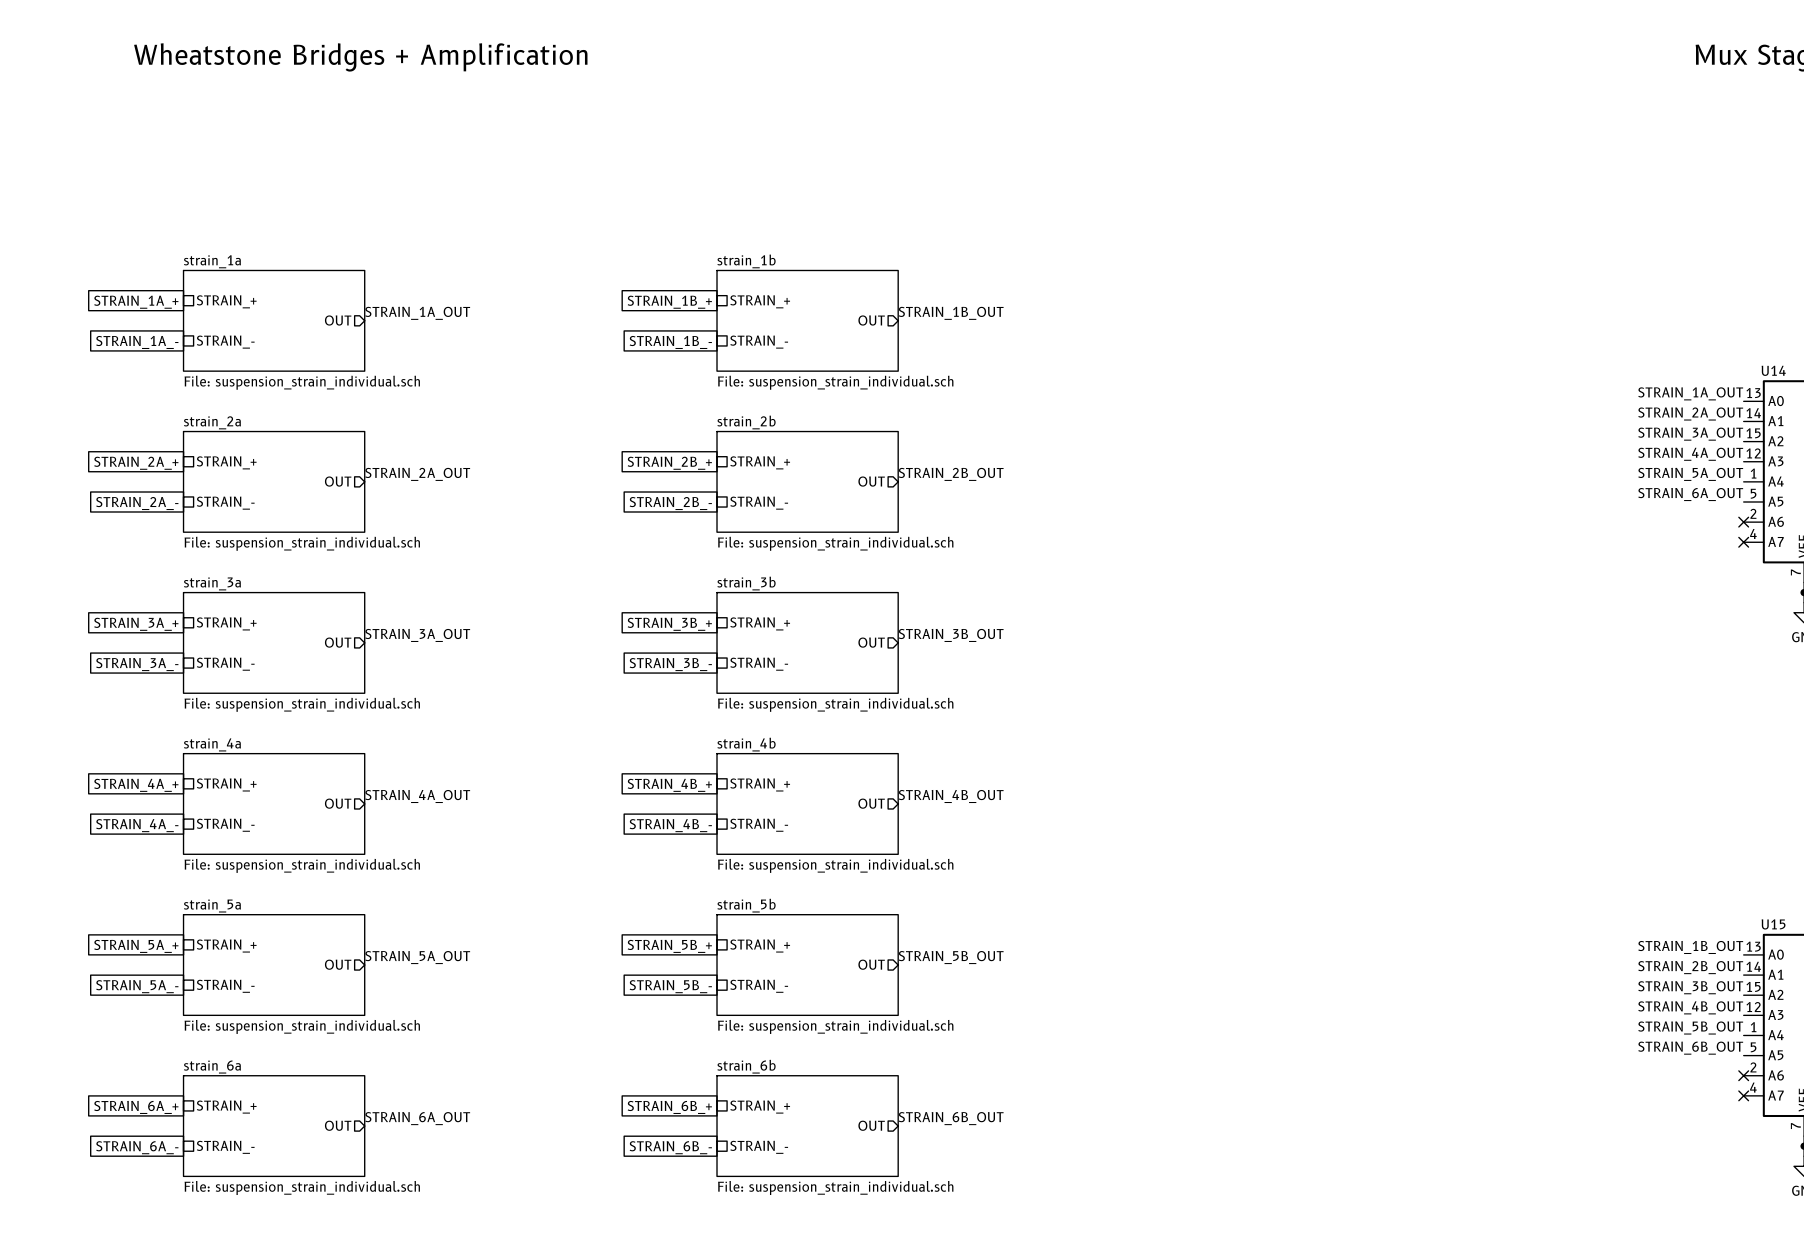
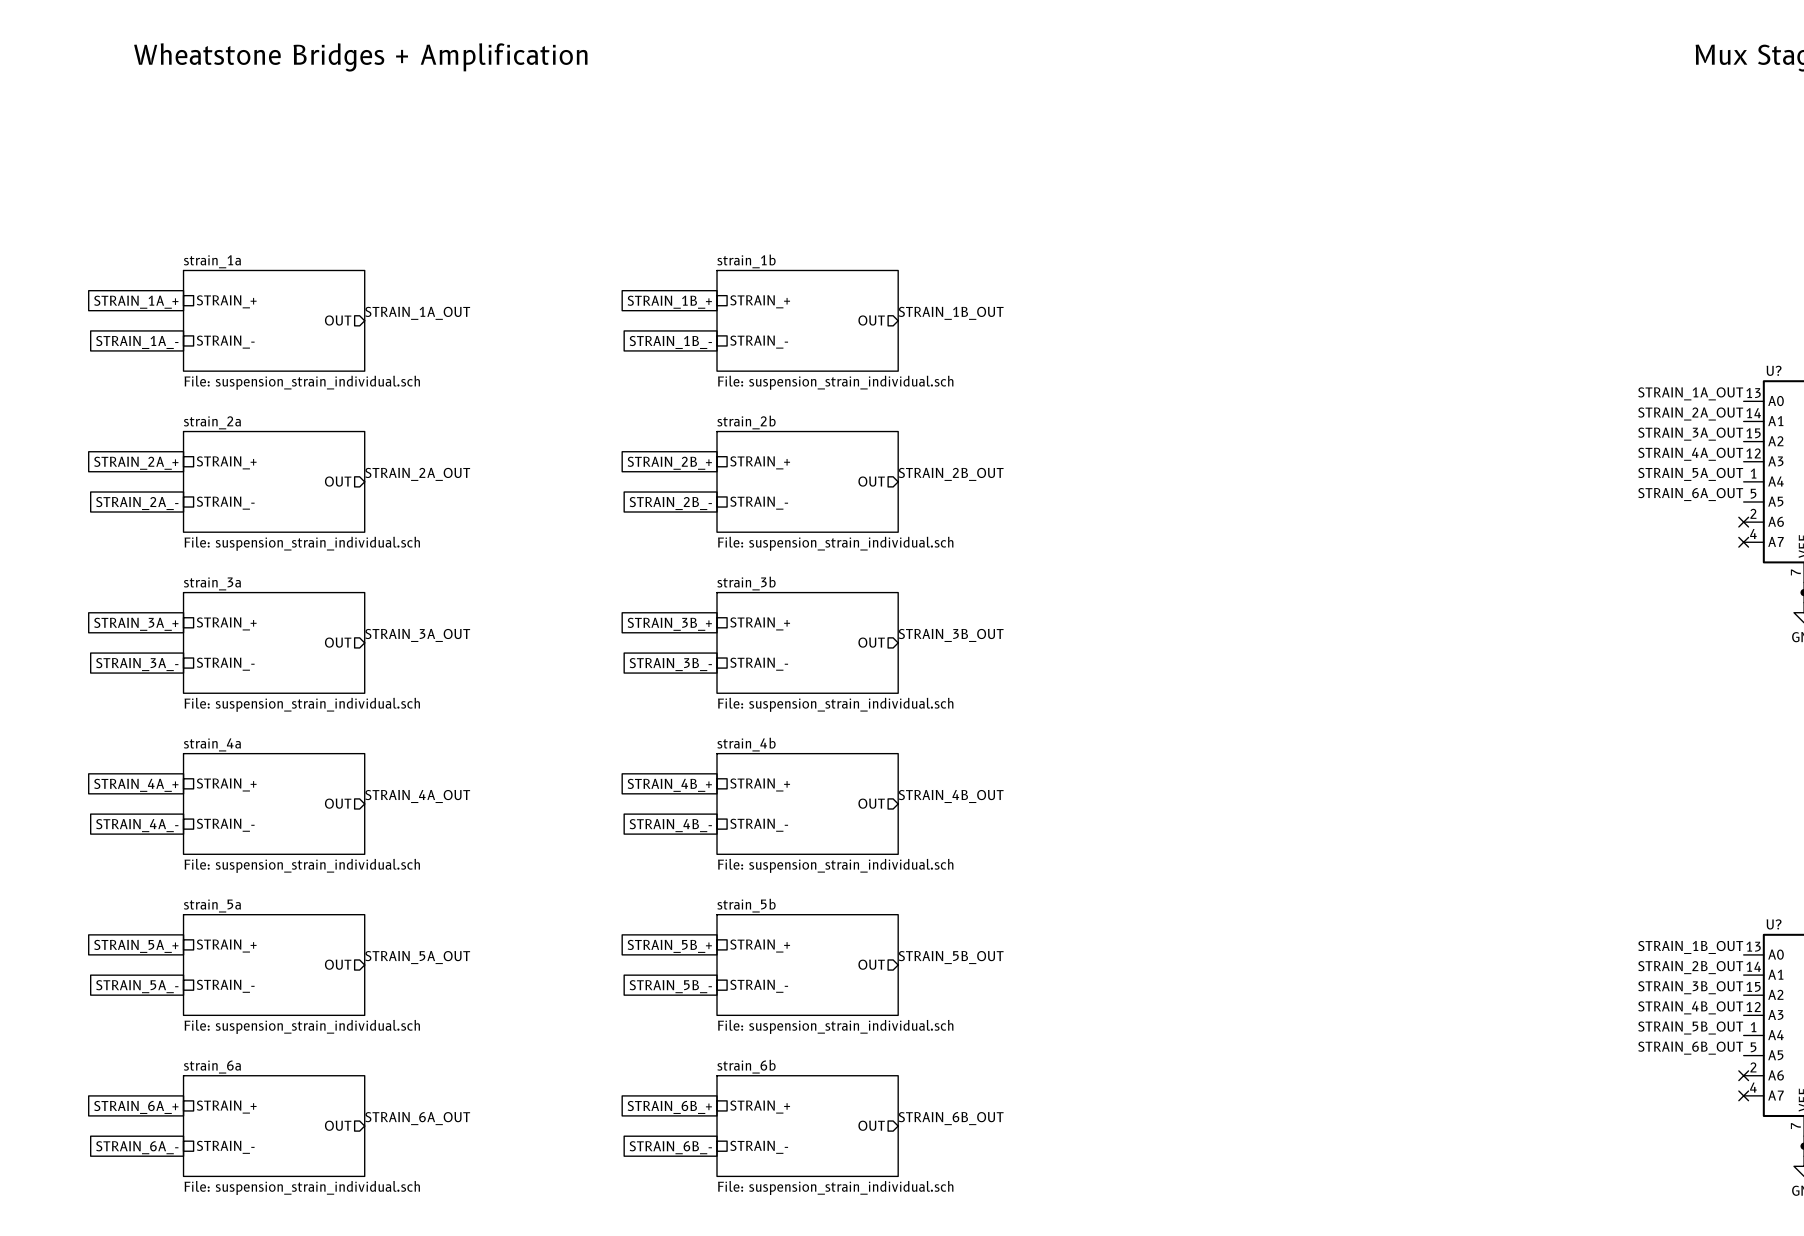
U14 name: U14 (1773, 370) -> U? (1774, 370)
U15 name: U15 (1773, 924) -> U? (1774, 924)

